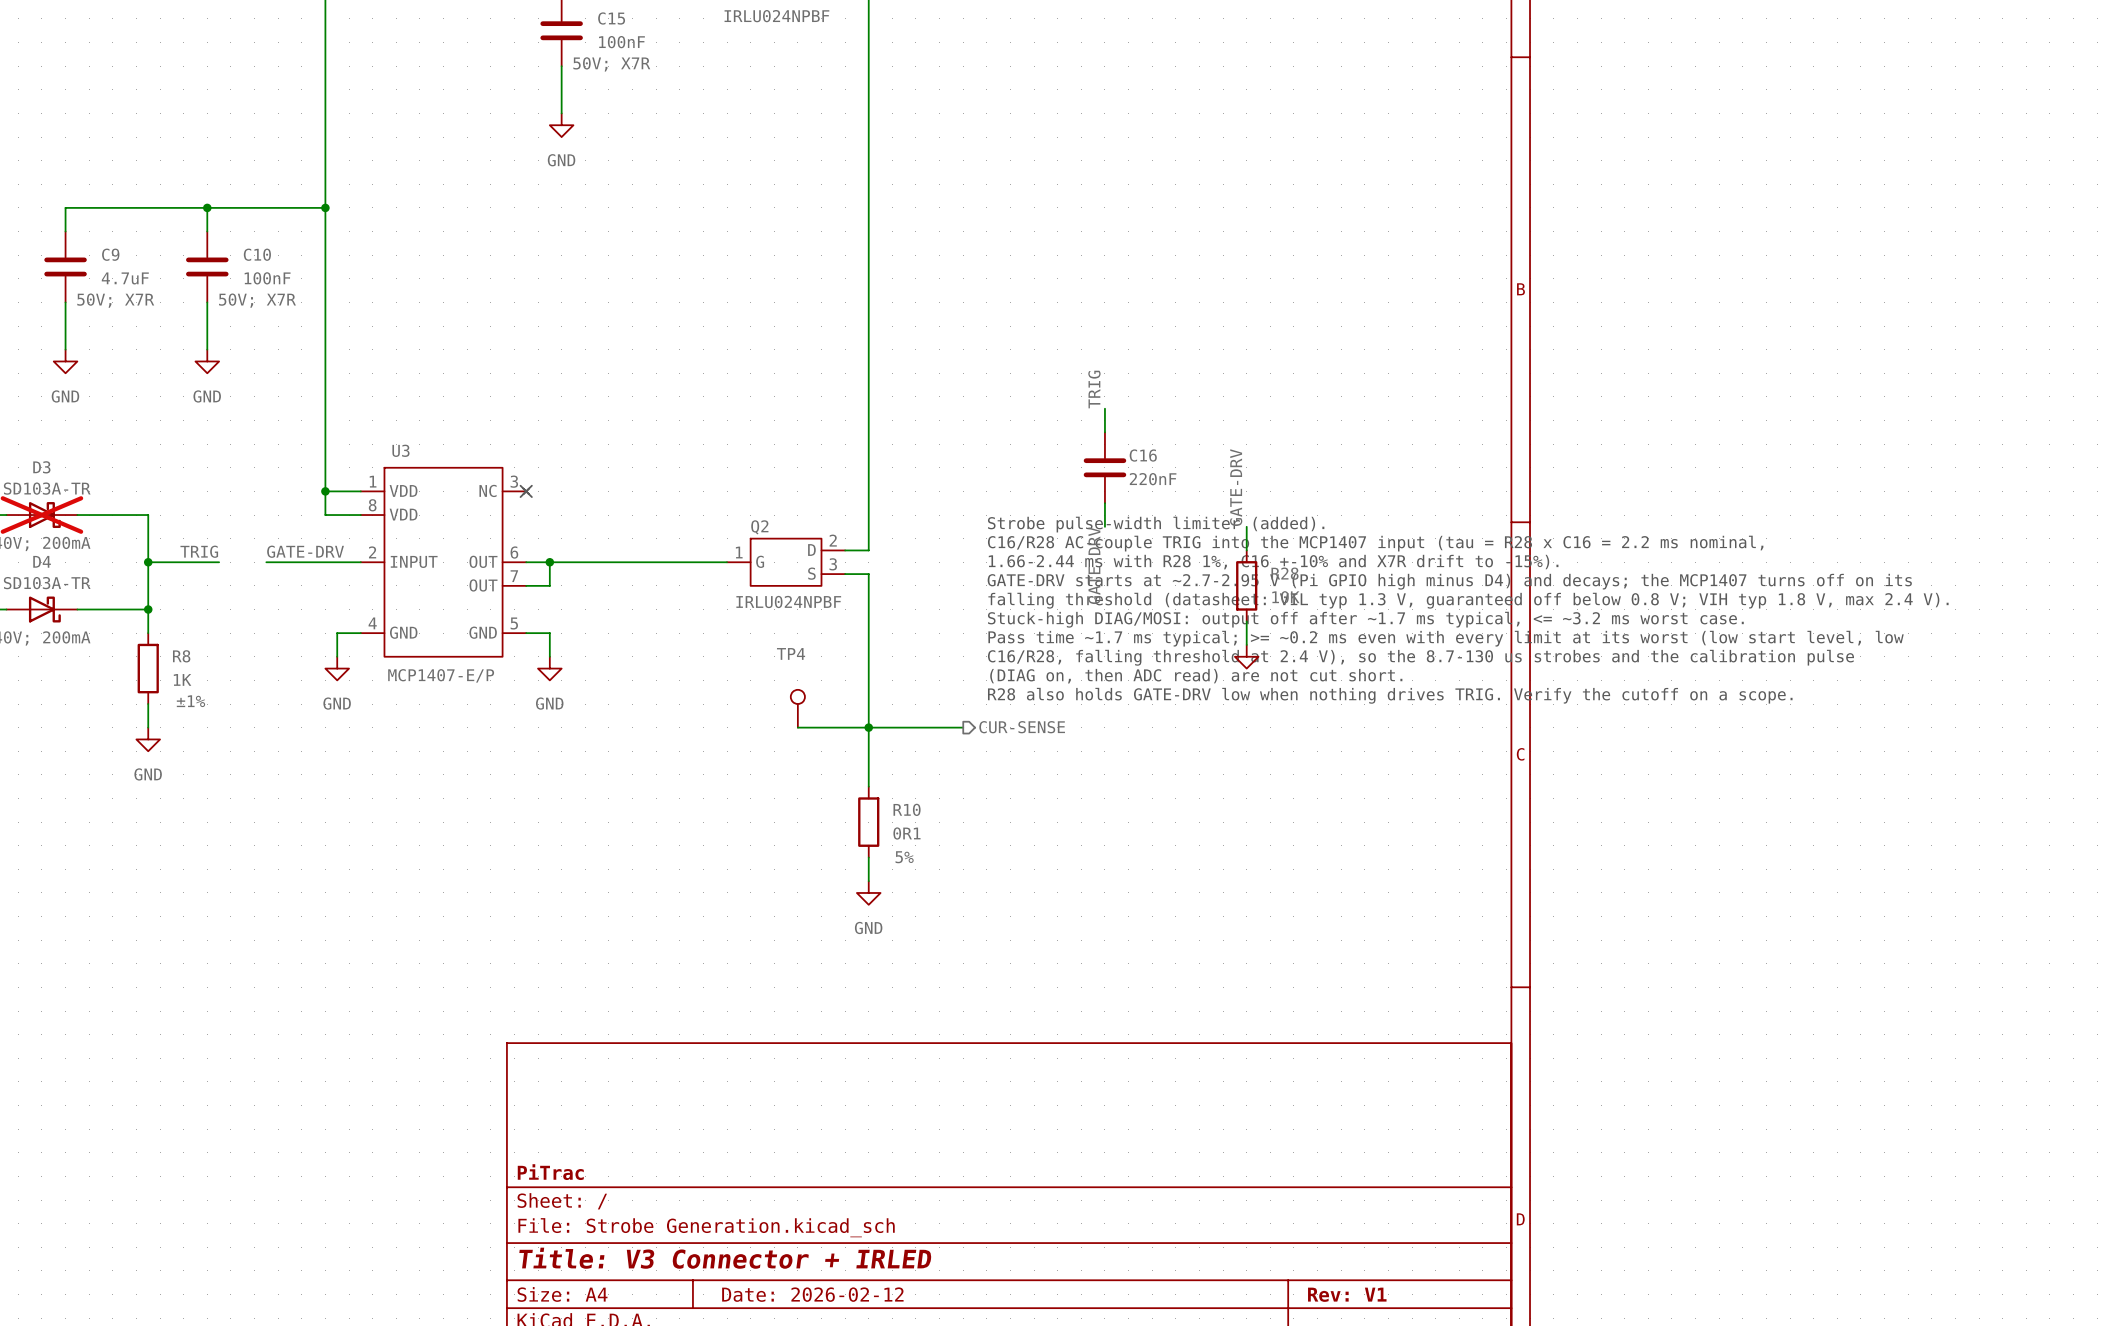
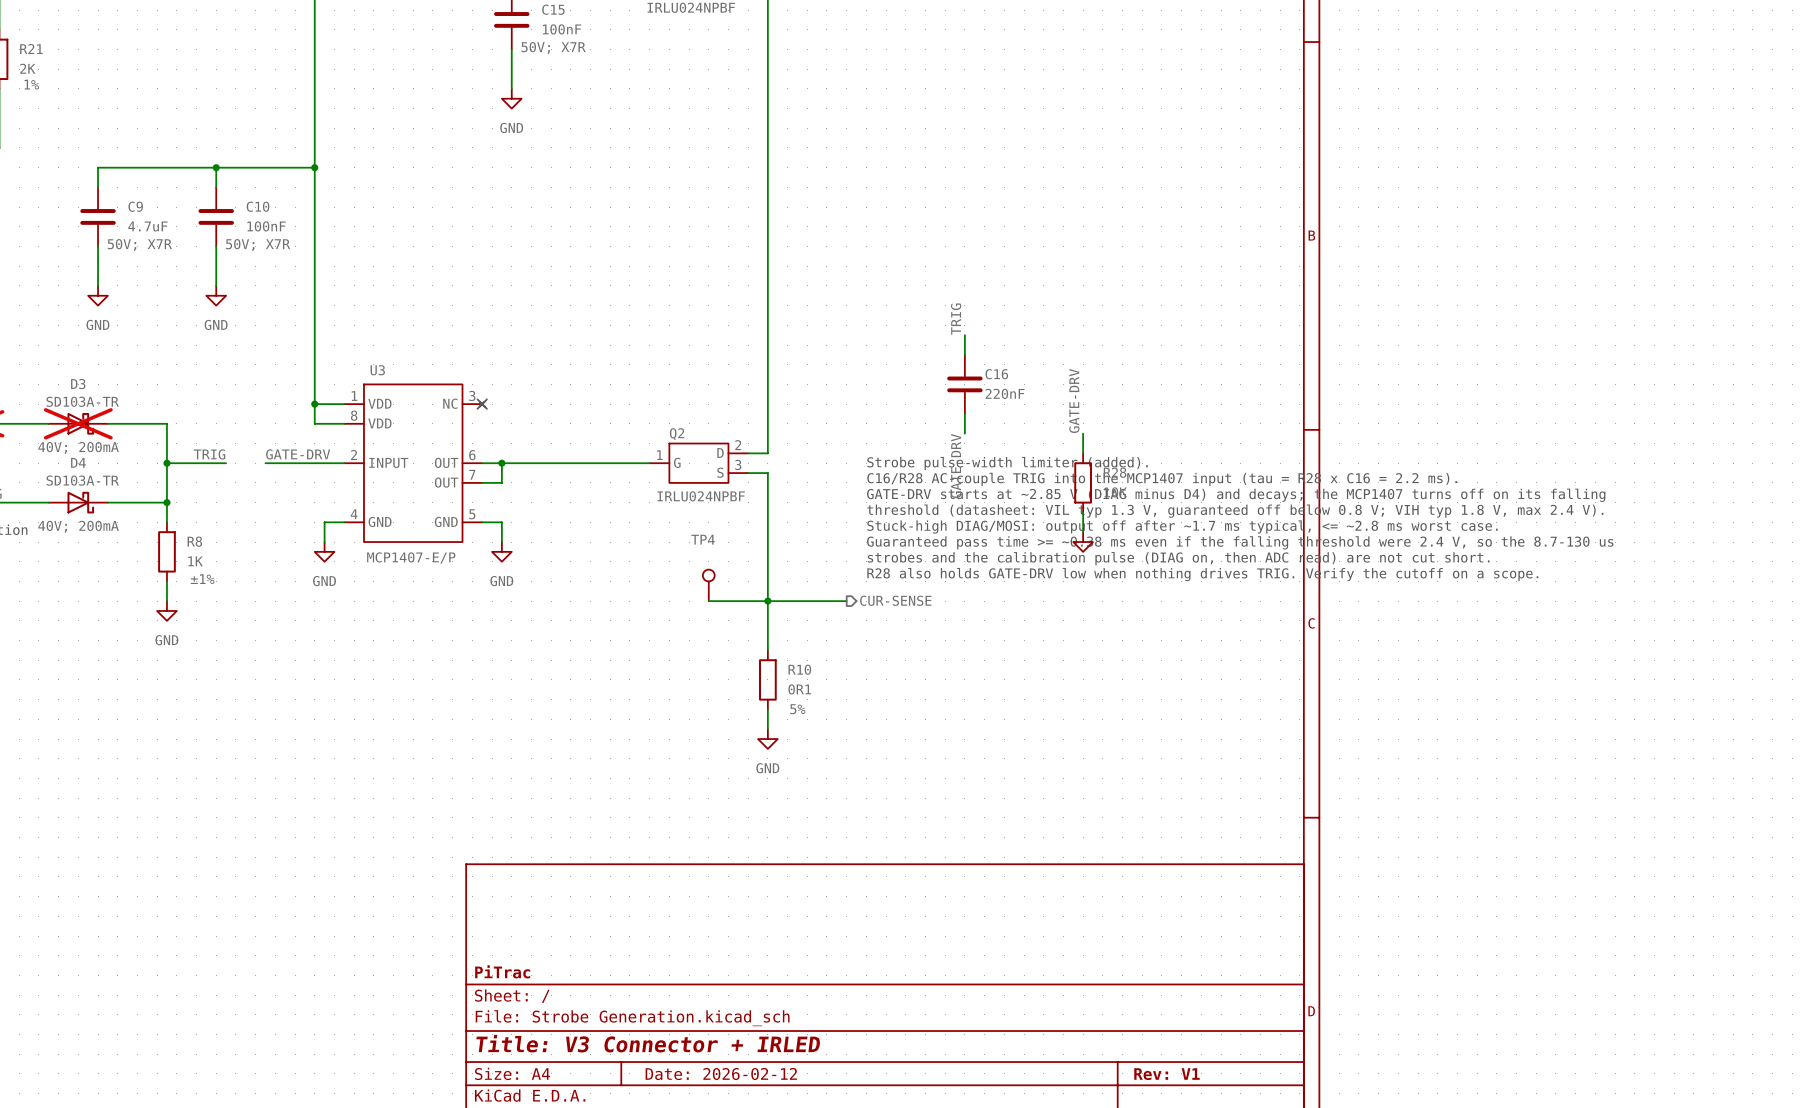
text: Strobe pulse-width limiter (added). (1156, 524) -> none
text: C16/R28 AC-couple TRIG into the MCP1407 input (tau = R28 x C16 = 2.2 ms nominal, (1375, 543) -> none
text: 1.66-2.44 ms with R28 1%, C16 +-10% and X7R drift to -15%). (1273, 562) -> Strobe pulse-width limiter (added). (1007, 463)
text: GATE-DRV starts at ~2.7-2.95 V (Pi GPIO high minus D4) and decays; the MCP1407 turns off on its (1449, 581) -> C16/R28 AC-couple TRIG into the MCP1407 input (tau = R28 x C16 = 2.2 ms). (1162, 479)
text: falling threshold (datasheet: VIL typ 1.3 V, guaranteed off below 0.8 V; VIH typ 1.8 V, max 2.4 V). (1468, 600) -> GATE-DRV starts at ~2.85 V (DIAG minus D4) and decays; the MCP1407 turns off on its falling (1236, 495)
text: Stuck-high DIAG/MOSI: output off after ~1.7 ms typical, <= ~3.2 ms worst case. (1365, 619) -> threshold (datasheet: VIL typ 1.3 V, guaranteed off below 0.8 V; VIH typ 1.8 V, max 2.4 V). (1235, 511)
text: Pass time ~1.7 ms typical; >= ~0.2 ms even with every limit at its worst (low start level, low (1446, 638) -> Stuck-high DIAG/MOSI: output off after ~1.7 ms typical, <= ~2.8 ms worst case. (1182, 526)
text: C16/R28, falling threshold at 2.4 V), so the 8.7-130 us strobes and the calibration pulse (1420, 657) -> Guaranteed pass time >= ~0.38 ms even if the falling threshold were 2.4 V, so the 8.7-130 us (1240, 542)
text: (DIAG on, then ADC read) are not cut short. (1196, 676) -> strobes and the calibration pulse (DIAG on, then ADC read) are not cut short. (1178, 558)

